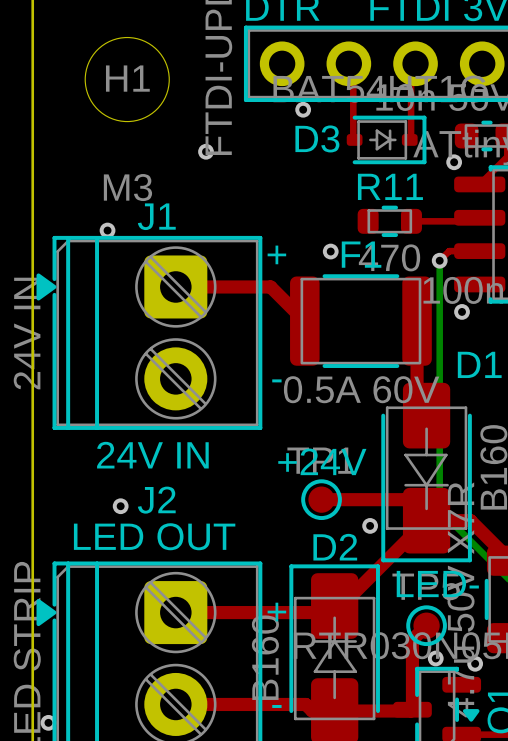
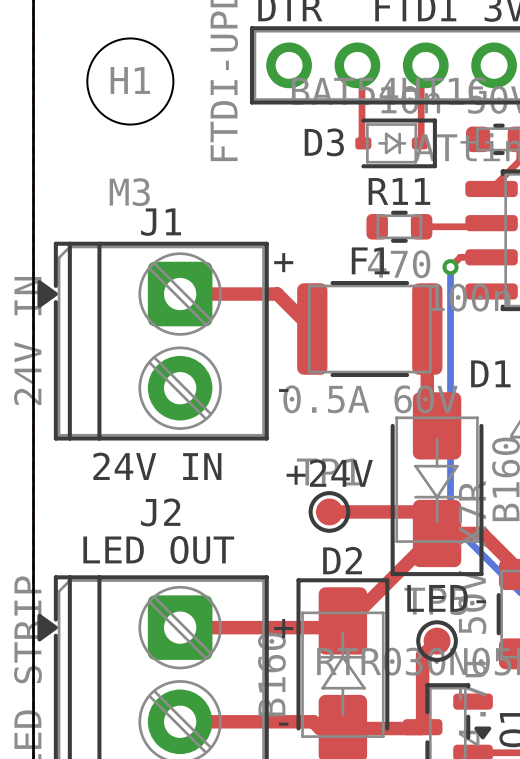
via: (303, 109) -> none
via: (206, 151) -> none
via: (454, 162) -> none
via: (107, 230) -> none
via: (330, 251) -> none
via: (462, 311) -> none
via: (120, 506) -> none
via: (370, 525) -> none
via: (435, 658) -> none
via: (475, 663) -> none
via: (48, 722) -> none

